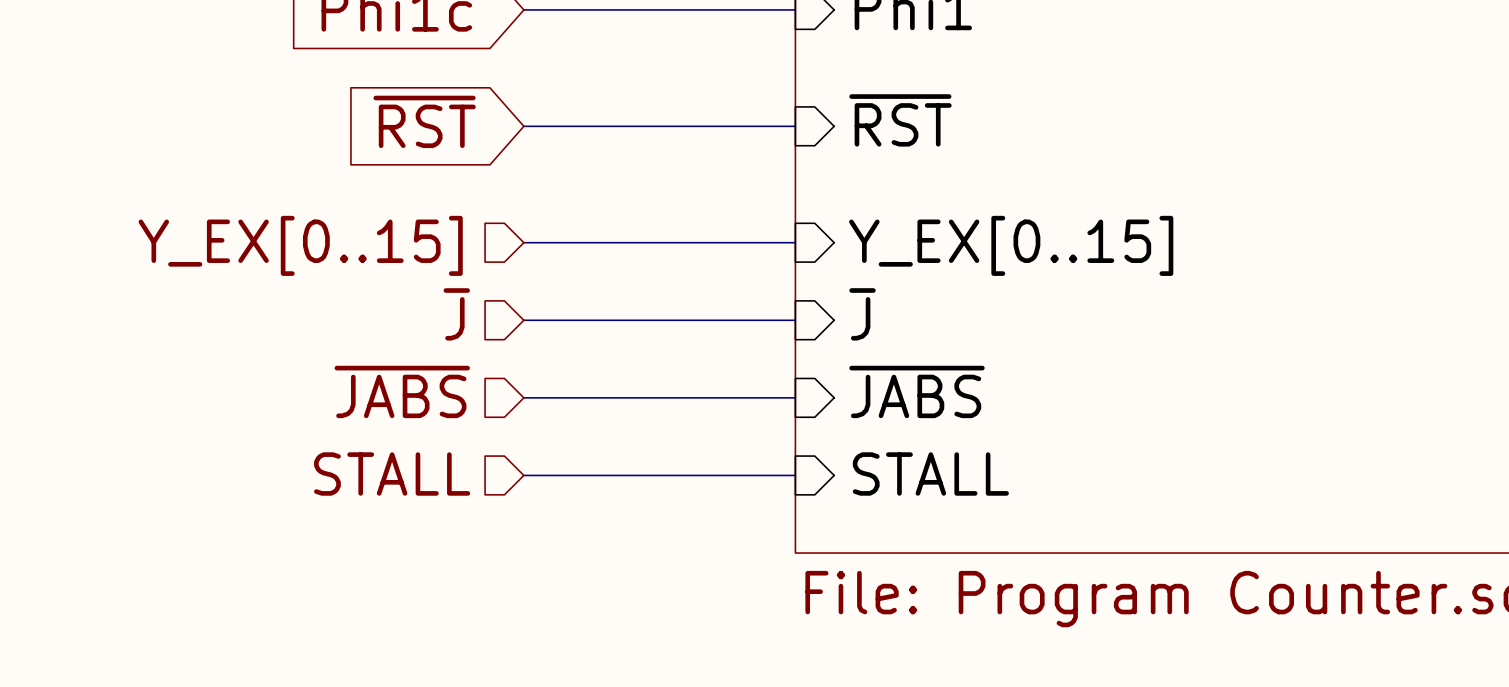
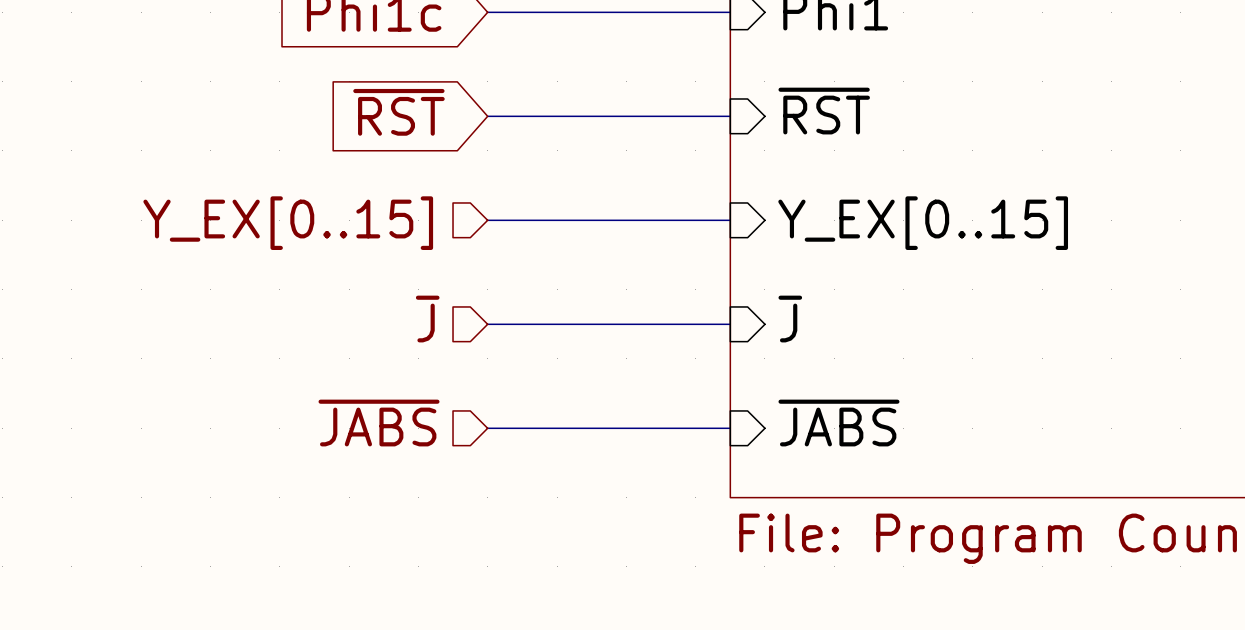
hierarchical label position: ~{J} (456, 314) -> ~{J} (427, 319)
sheet pin position: ~{J} (862, 314) -> ~{J} (790, 319)
wire: (523, 320) (795, 320) -> (487, 324) (730, 324)
hierarchical label: ~{JABS} (402, 391) -> none
sheet pin: ~{JABS} (917, 391) -> none
wire: (523, 397) (795, 397) -> none
hierarchical label: STALL (392, 474) -> ~{JABS} (379, 423)
sheet pin: STALL (930, 474) -> ~{JABS} (838, 423)

